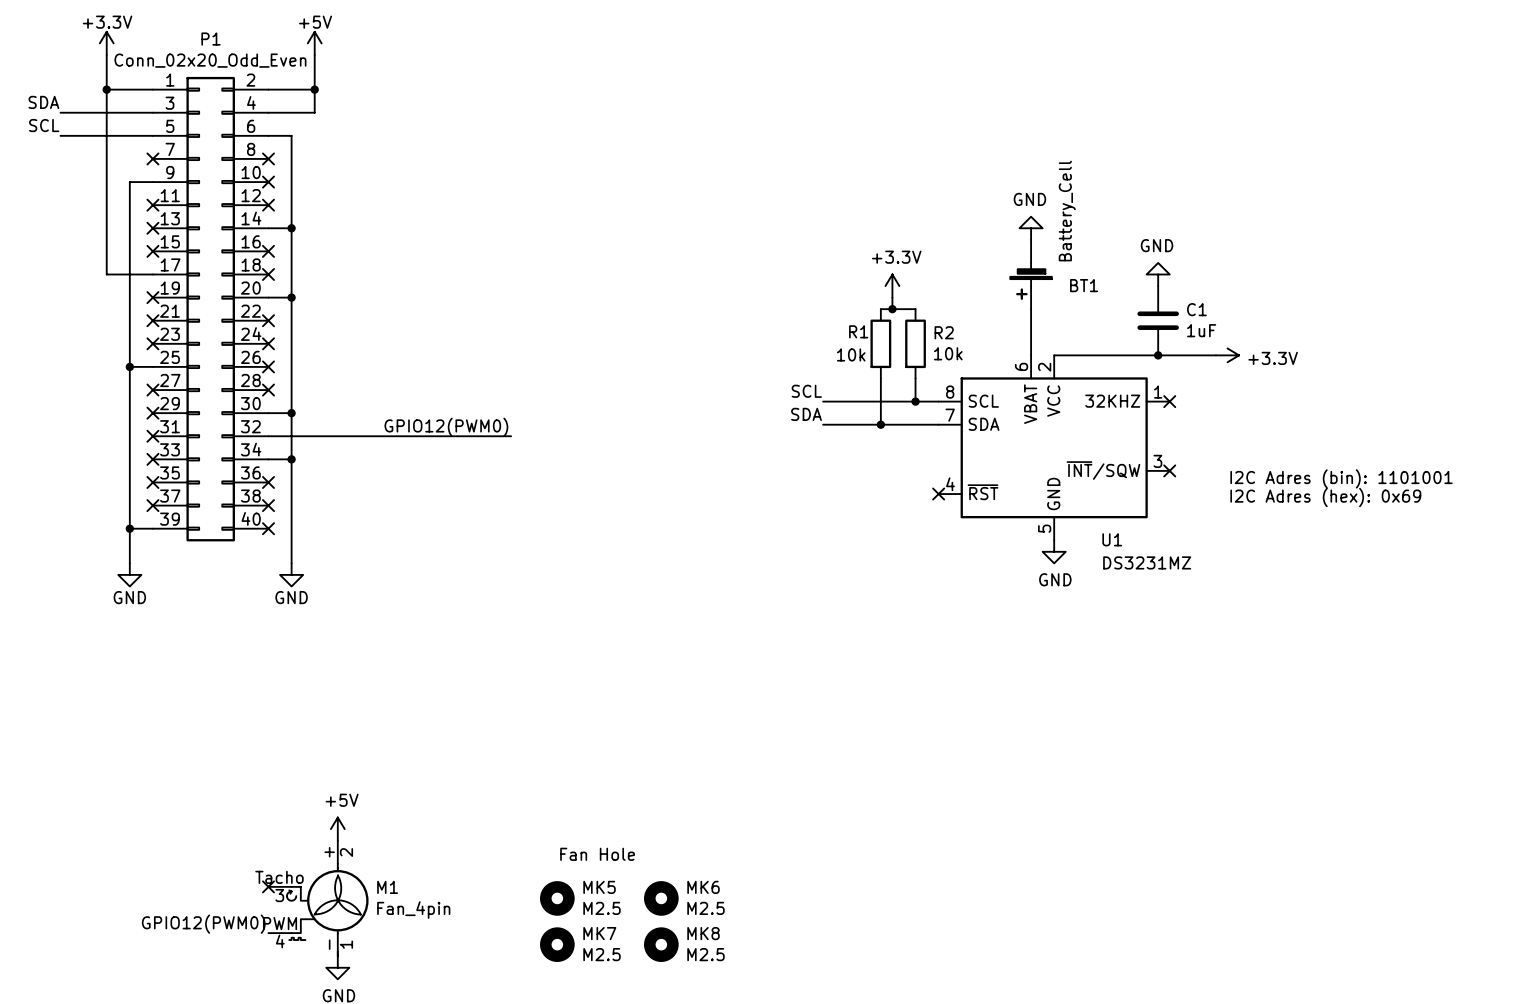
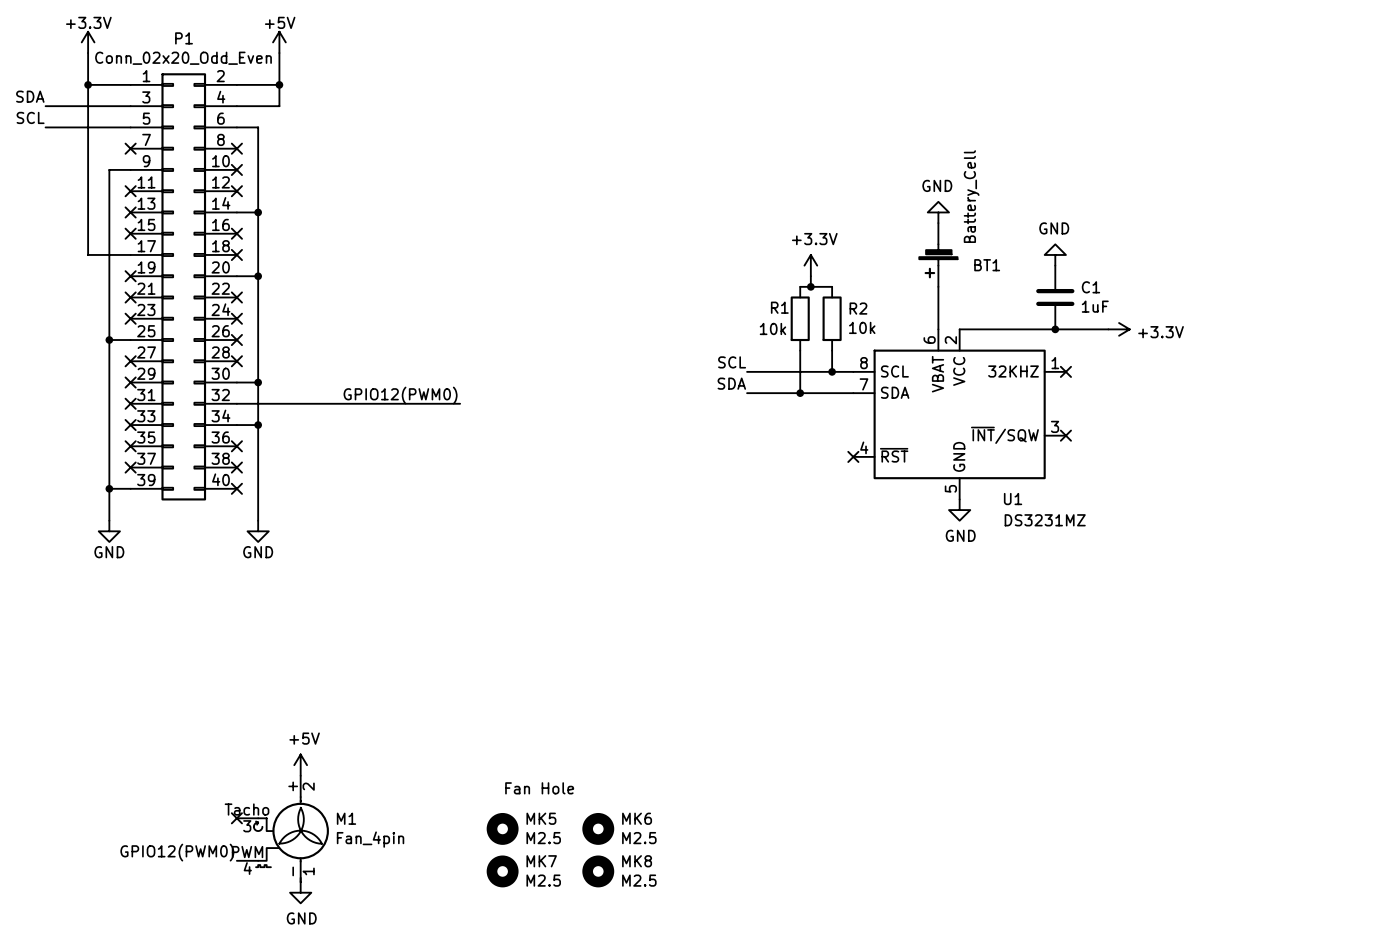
text: I2C Adres (bin): 1101001 (1341, 478) -> none
text: I2C Adres (hex): 0x69 (1325, 497) -> none

